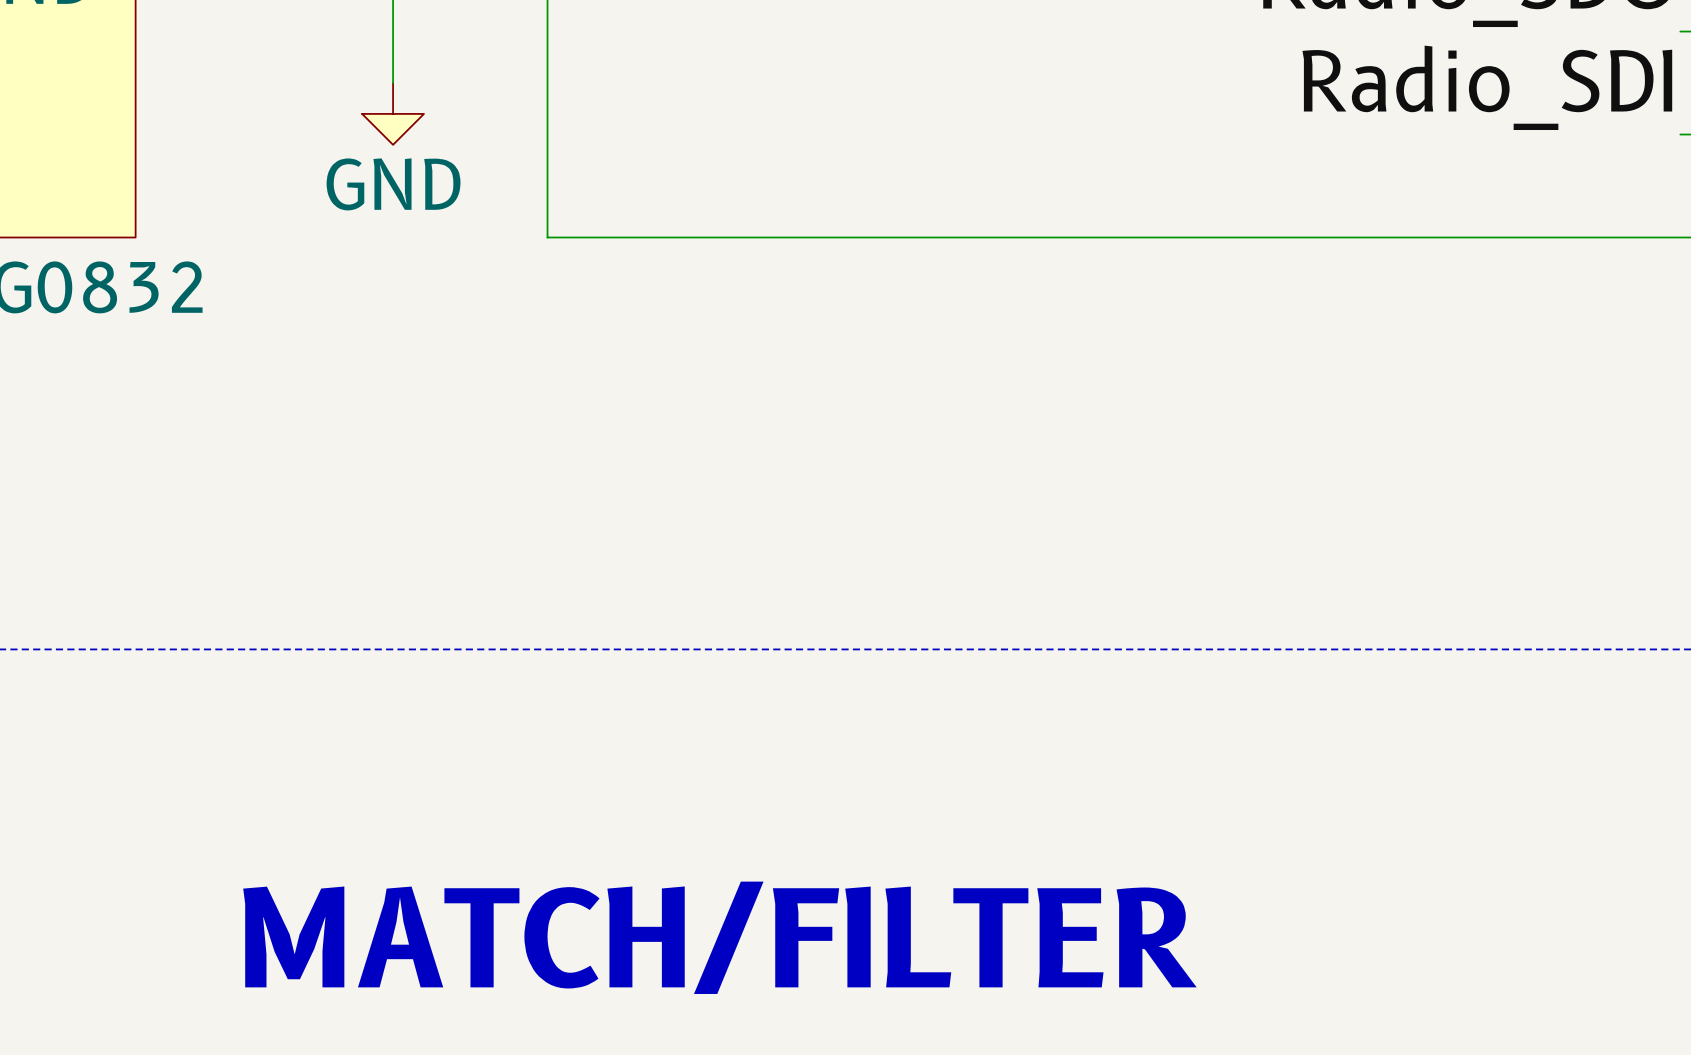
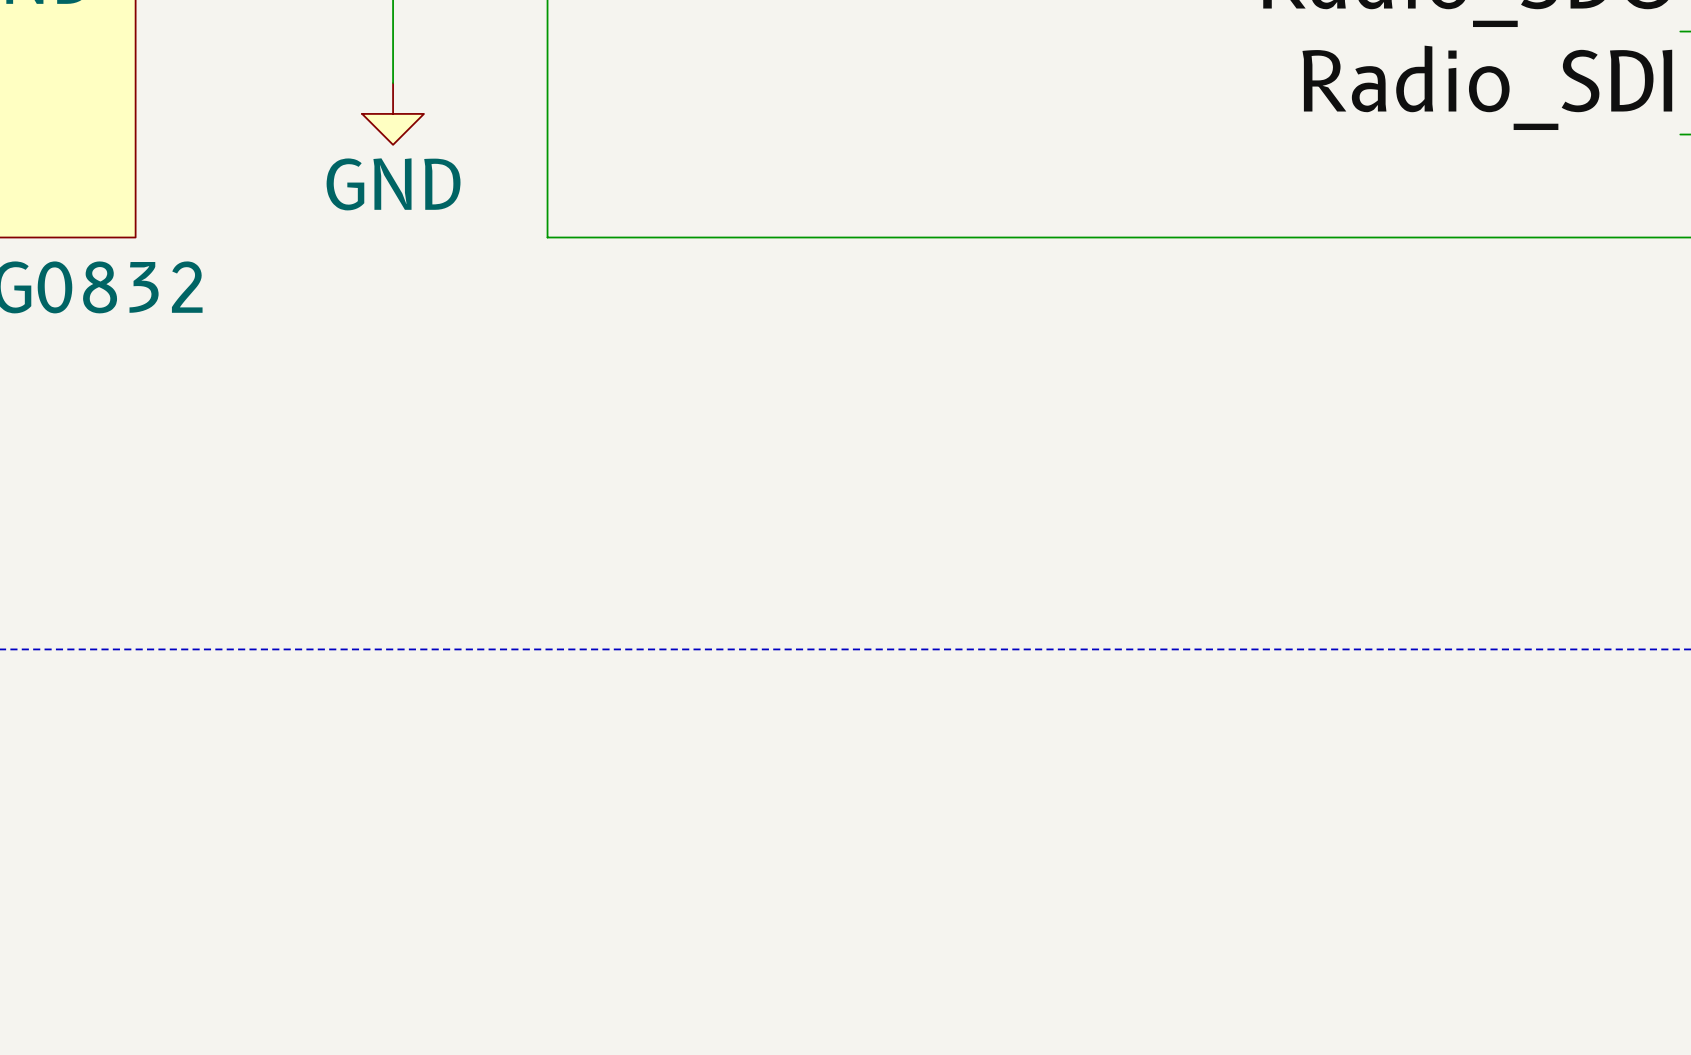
text: MATCH/FILTER (719, 937) -> none

